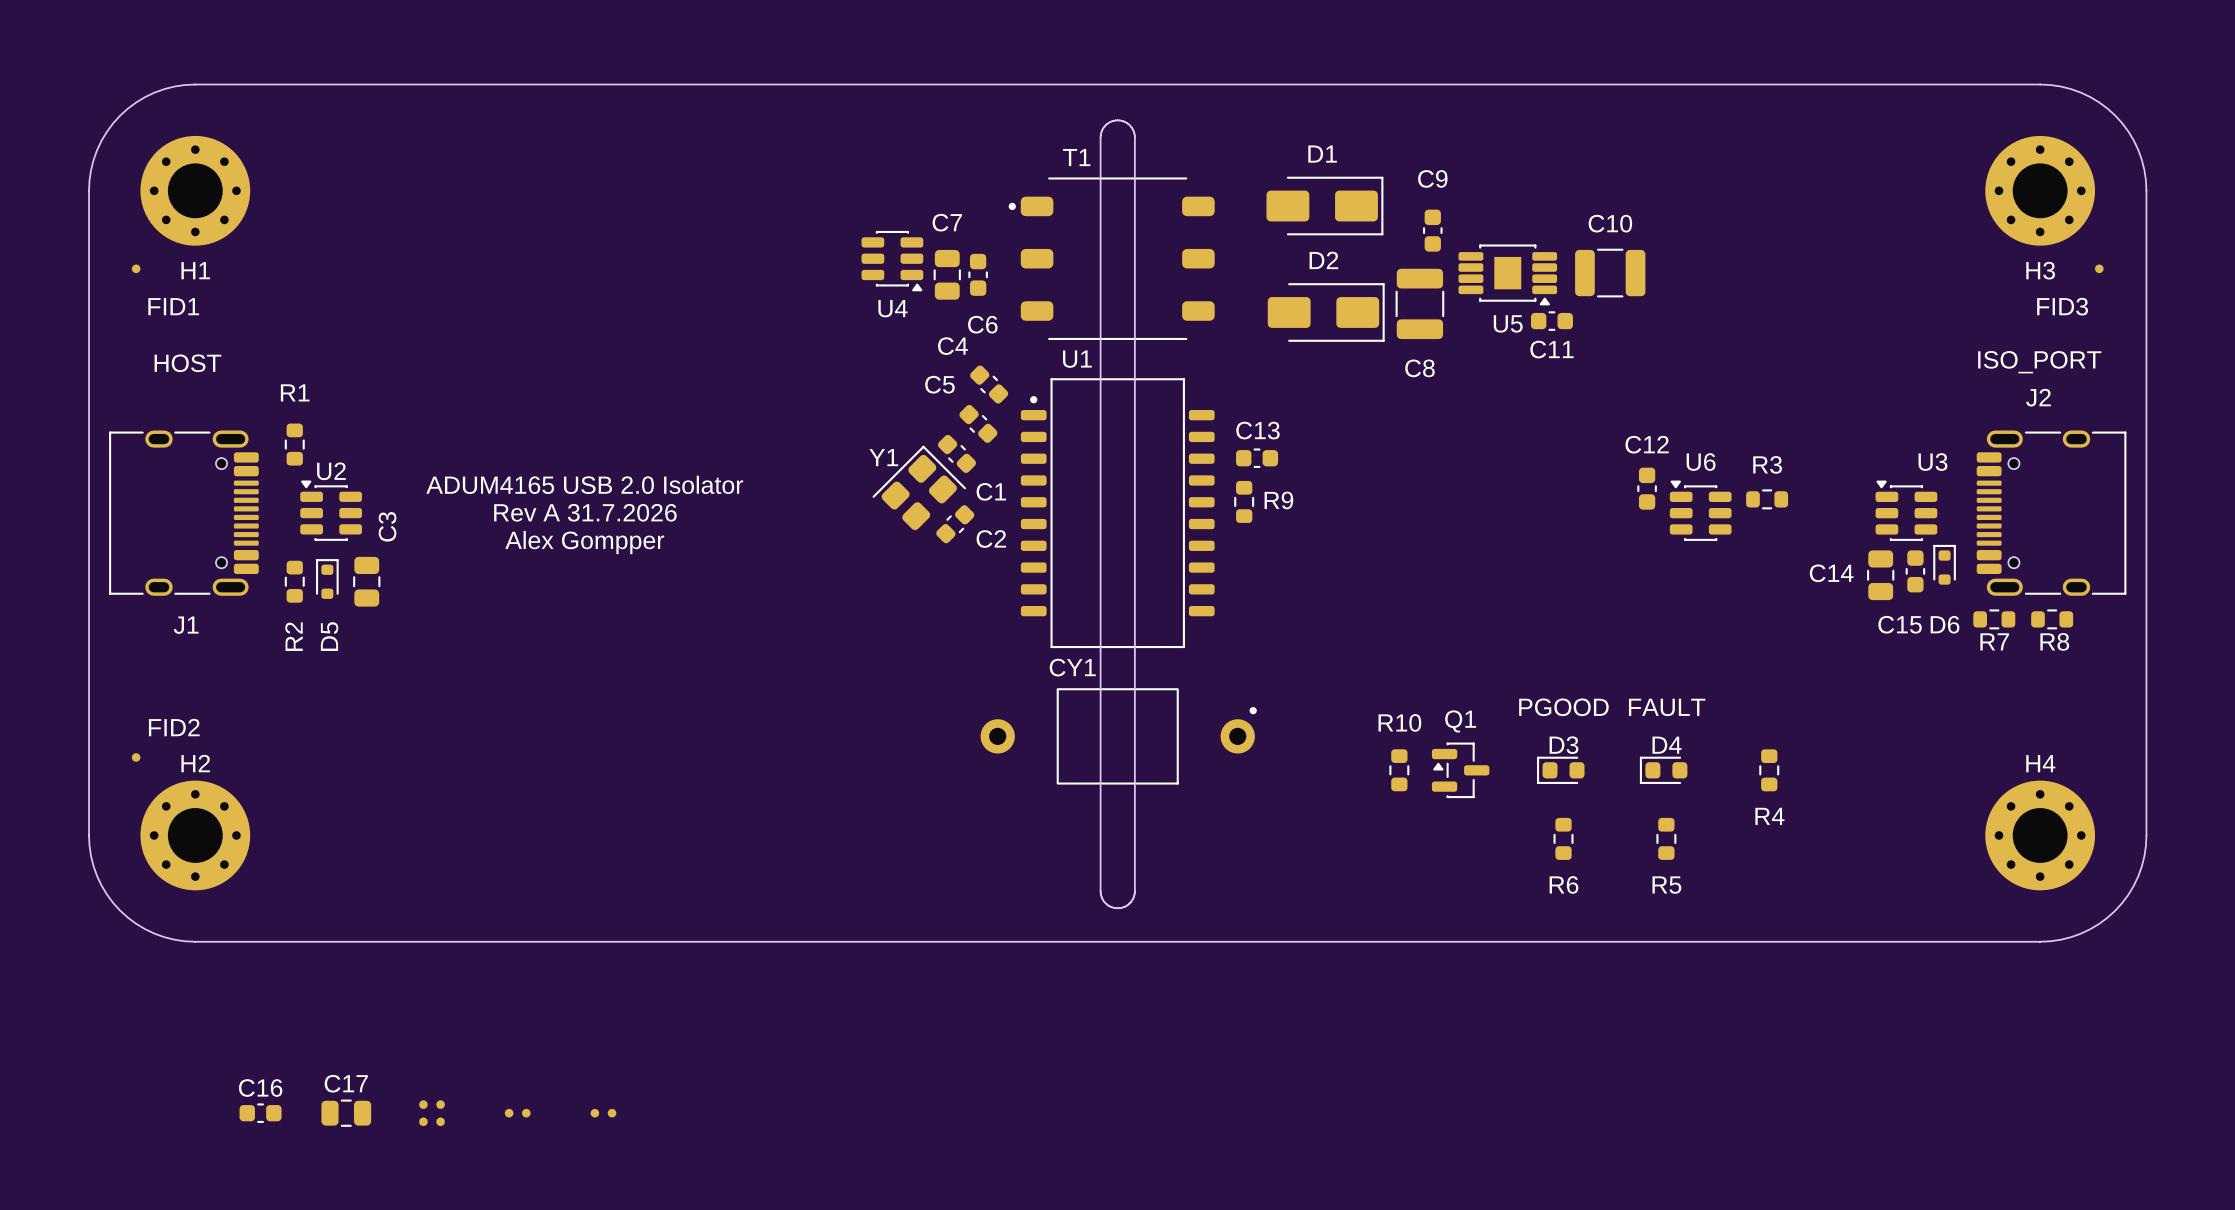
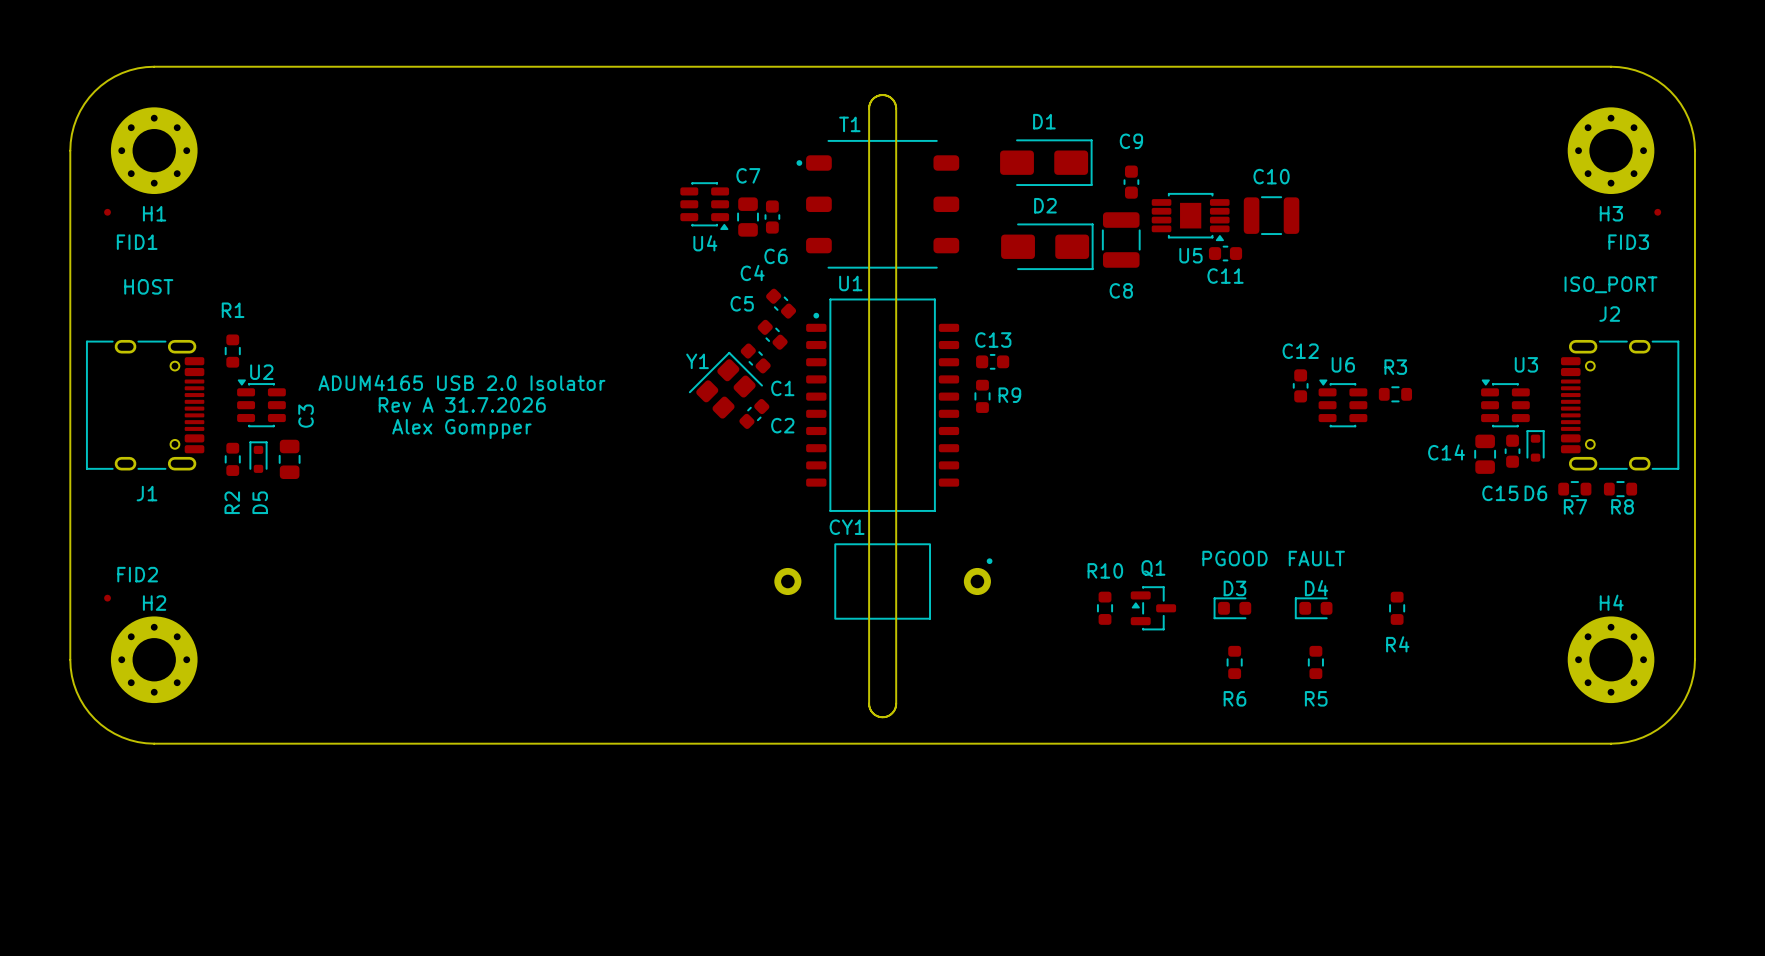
C16: (260, 1113) -> none
C17: (346, 1113) -> none
part: (432, 1113) -> none
part: (517, 1113) -> none
part: (603, 1113) -> none

